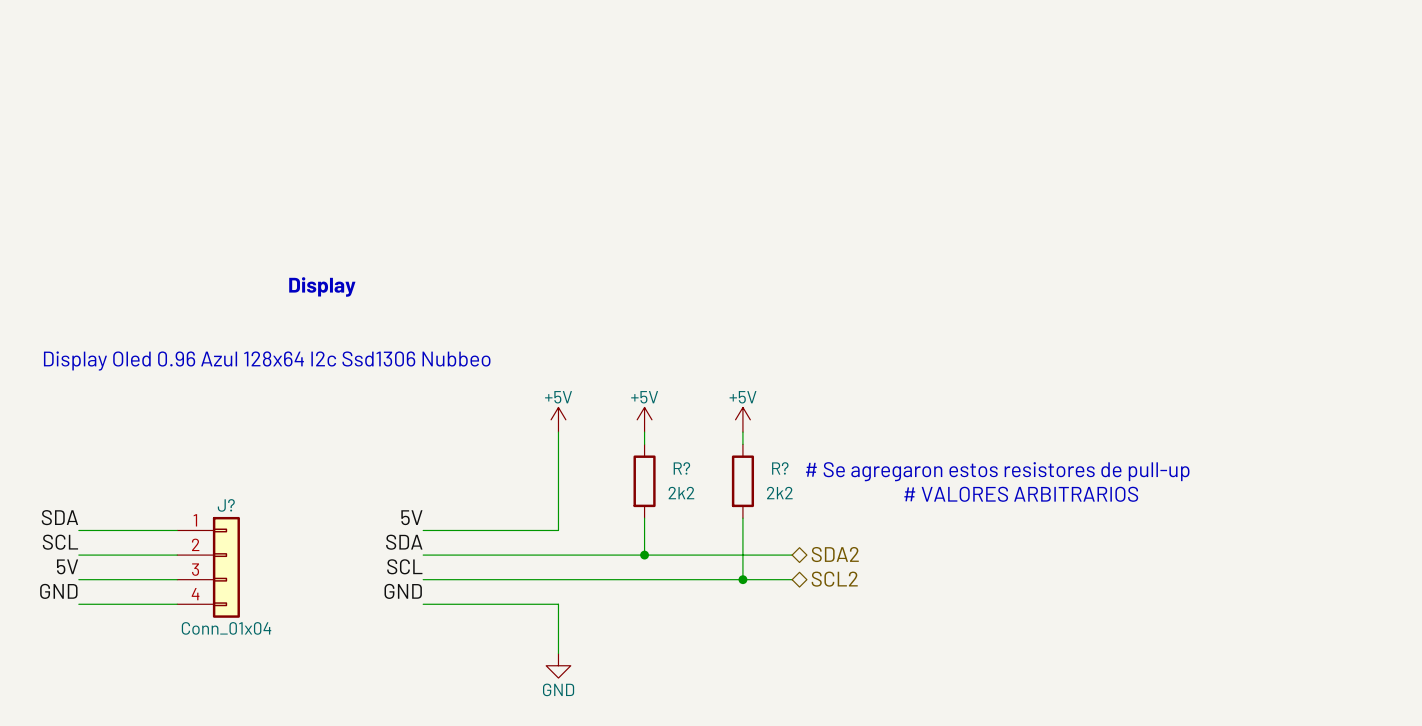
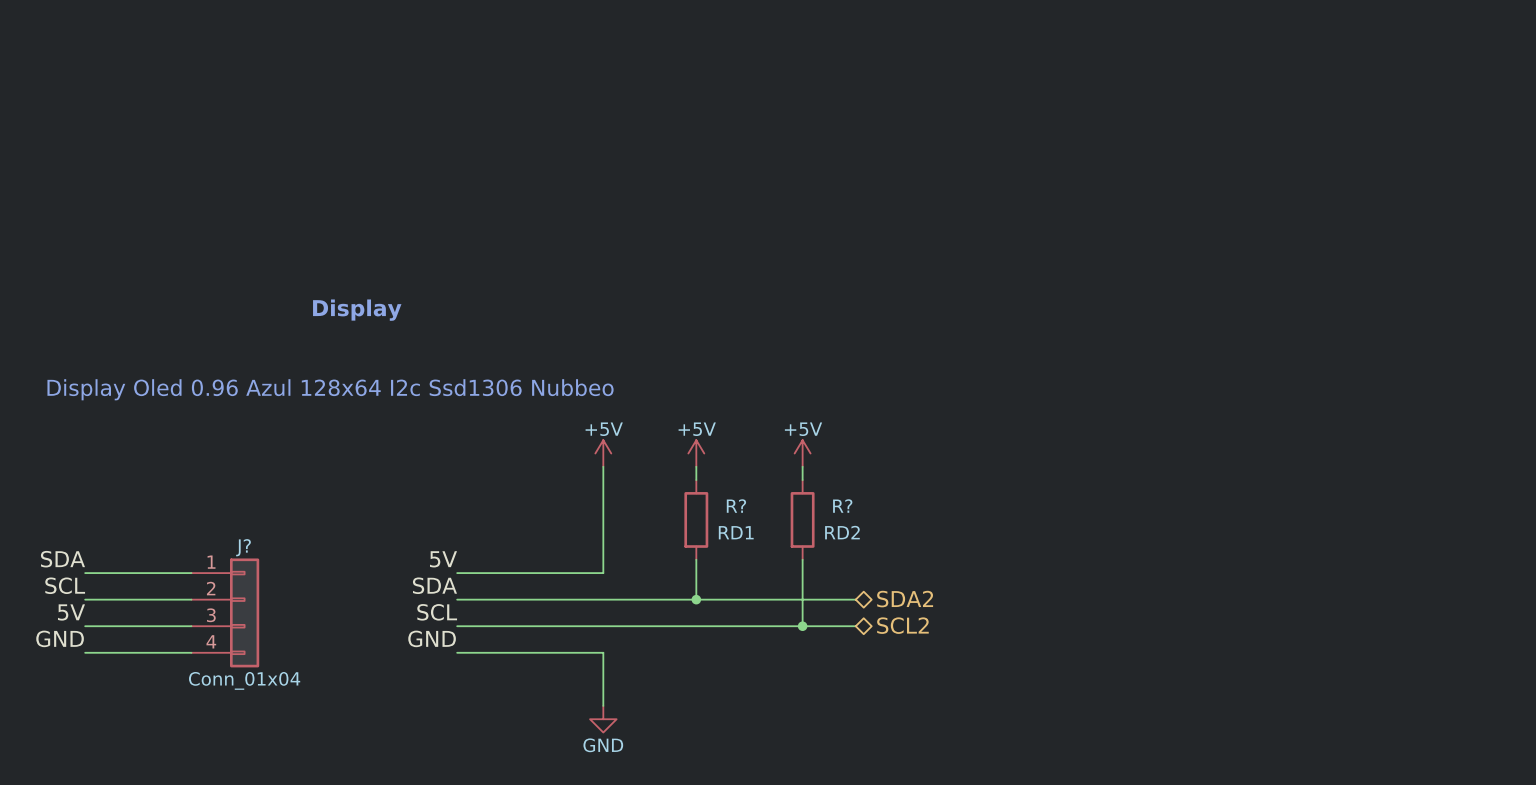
text: # Se agregaron estos resistores de pull-up (997, 471) -> none
R? value: 2k2 (681, 493) -> RD1 (736, 532)
R? value: 2k2 (779, 493) -> RD2 (842, 532)
text: # VALORES ARBITRARIOS (1021, 494) -> none

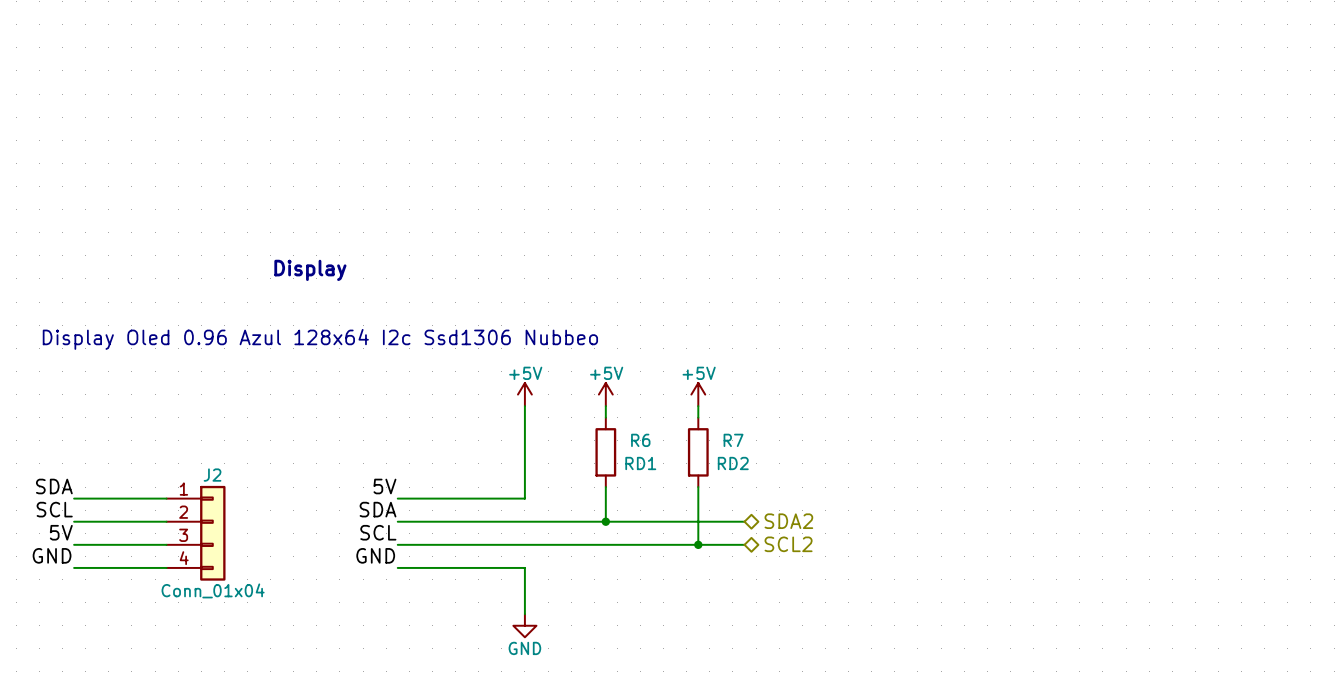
R? name: R? (736, 506) -> R6 (640, 440)
R? name: R? (842, 506) -> R7 (733, 440)
J? name: J? (243, 547) -> J2 (212, 475)

